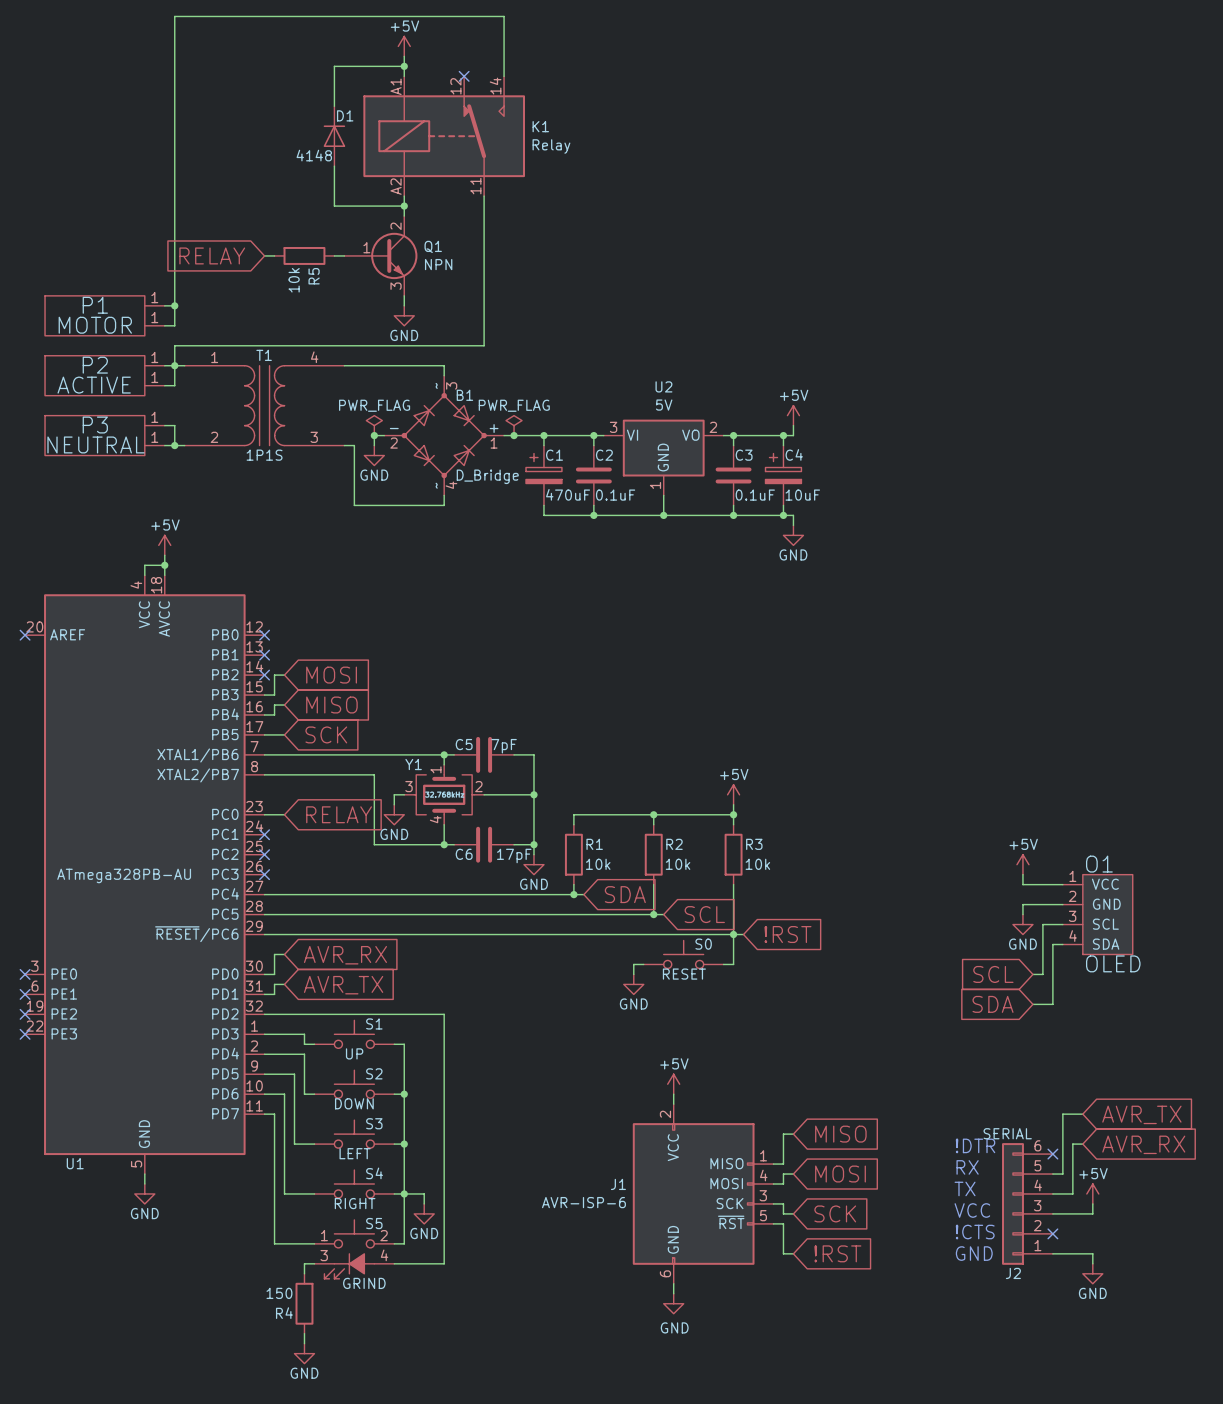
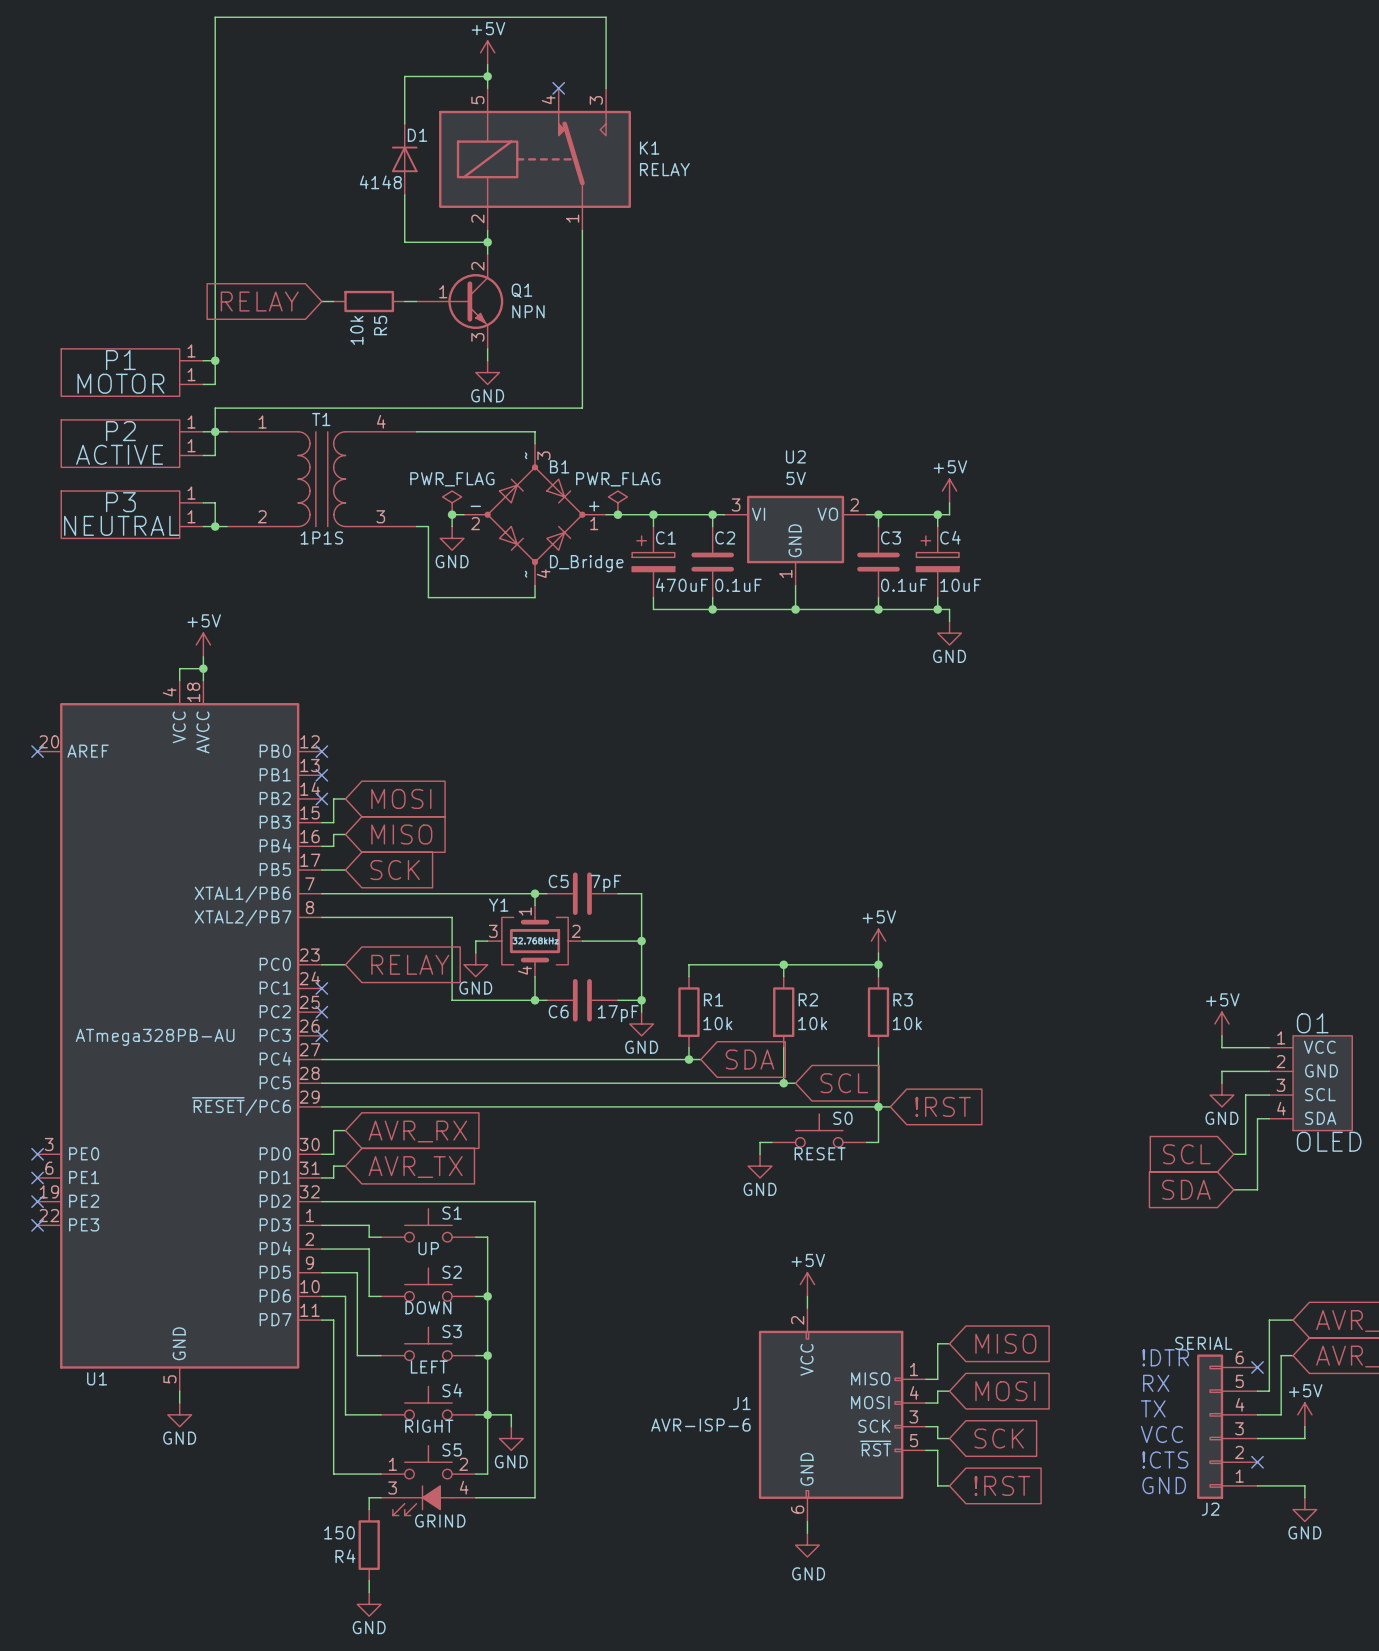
K1 pin number: A1 (396, 86) -> 5 (477, 100)
K1 pin number: 12 (455, 86) -> 4 (548, 99)
K1 pin number: 14 (495, 86) -> 3 (596, 100)
K1 value: Relay (551, 146) -> RELAY (664, 169)
K1 pin number: A2 (396, 186) -> 2 (477, 218)
K1 pin number: 11 (475, 186) -> 1 (572, 218)

